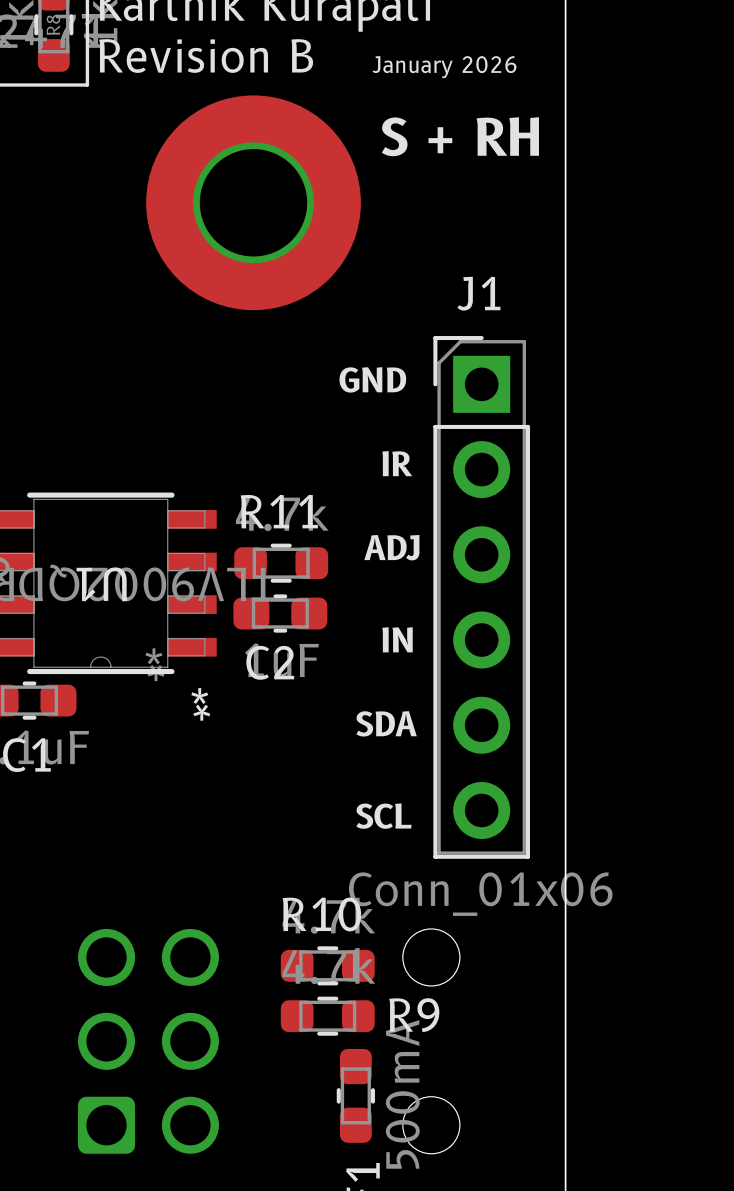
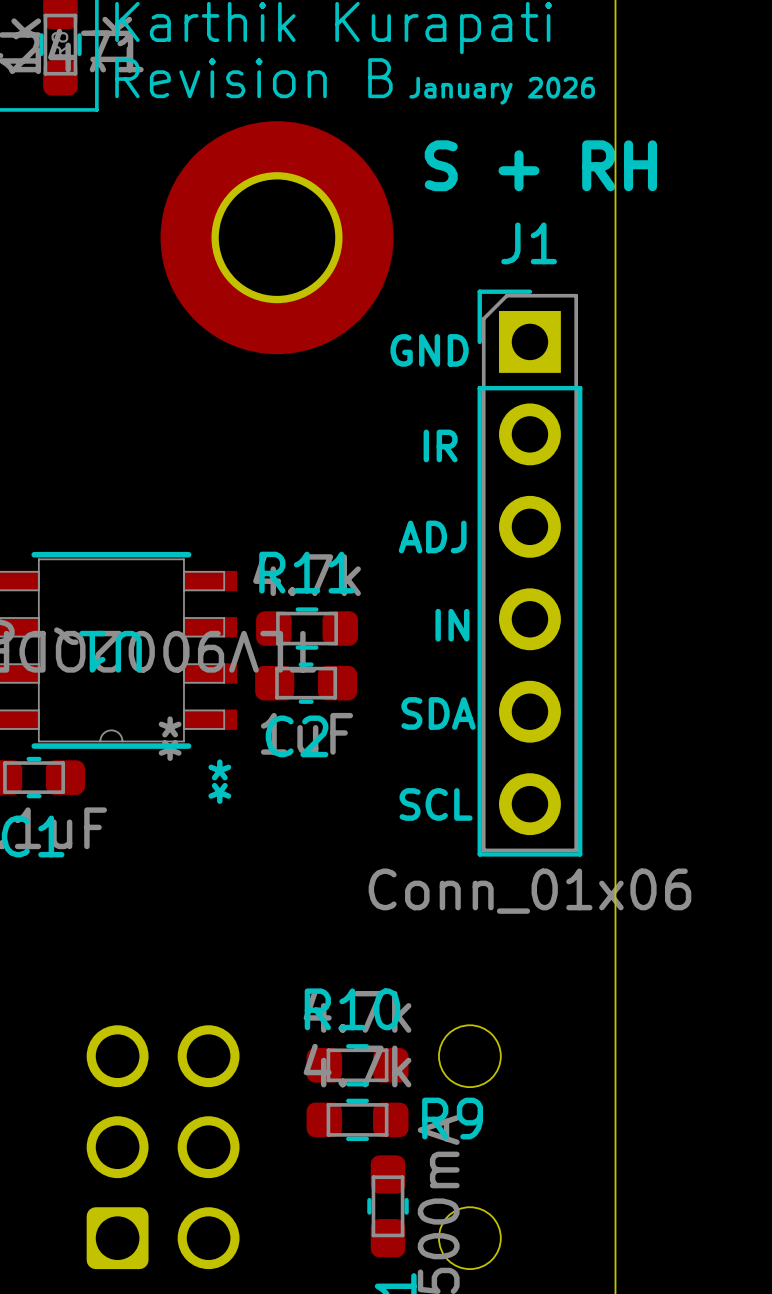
text position: GND (372, 379) -> GND (429, 350)
text position: IR (397, 463) -> IR (440, 445)
text position: ADJ (391, 547) -> ADJ (432, 536)
J1 position: (481, 597) -> (529, 573)
text position: IN (397, 639) -> IN (452, 625)
text position: SDA (386, 723) -> SDA (438, 713)
text position: SCL (383, 816) -> SCL (436, 804)

